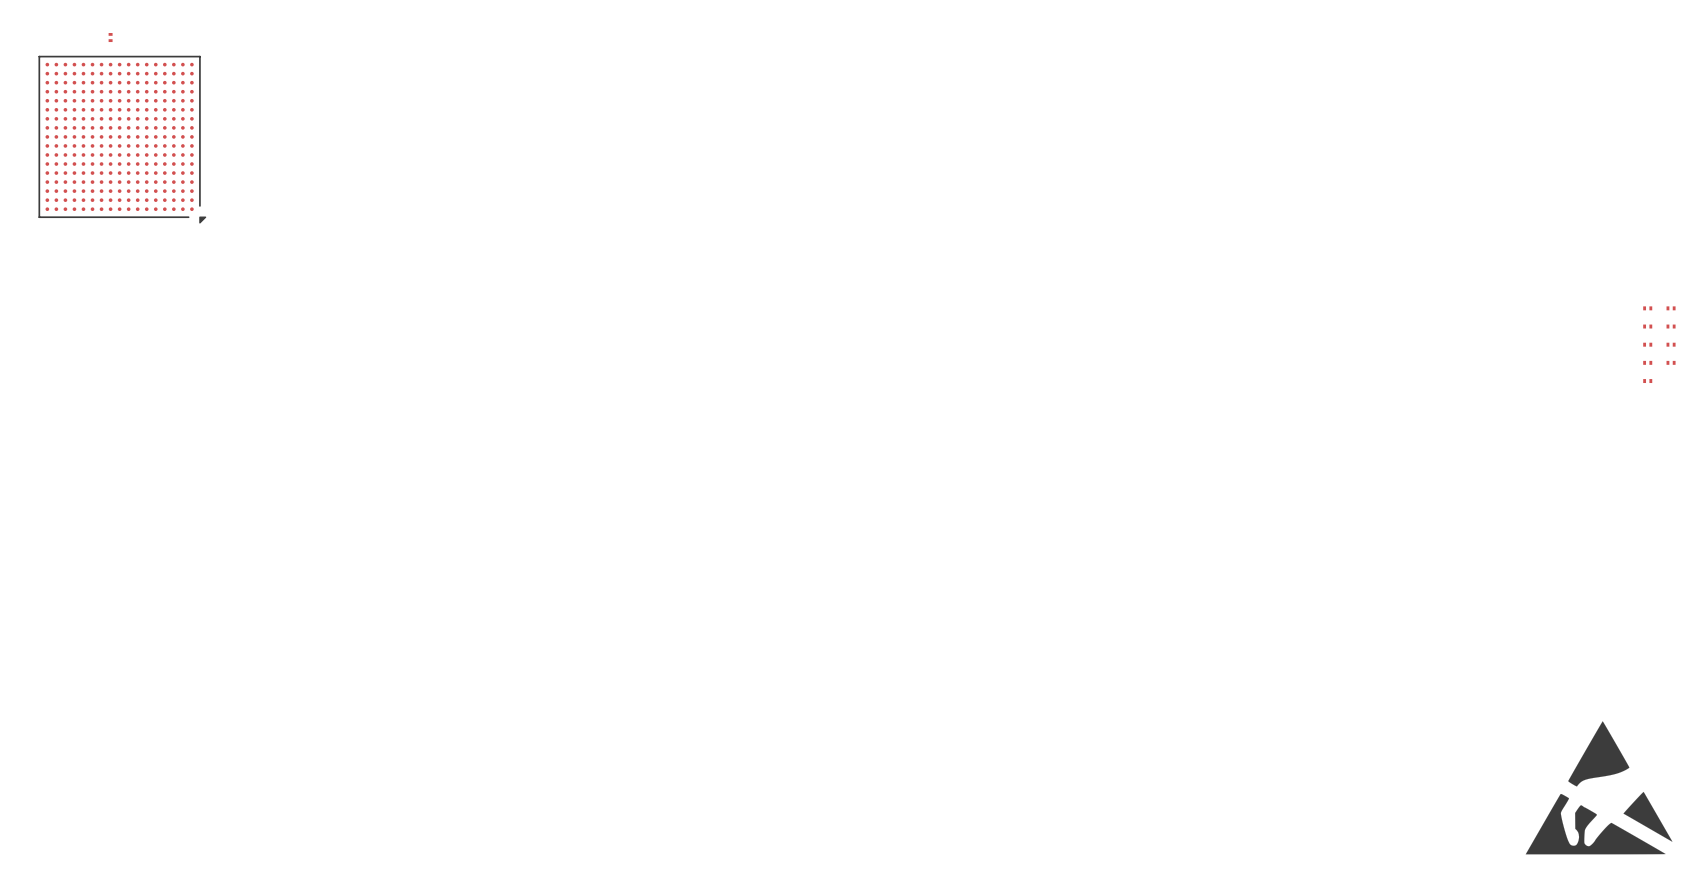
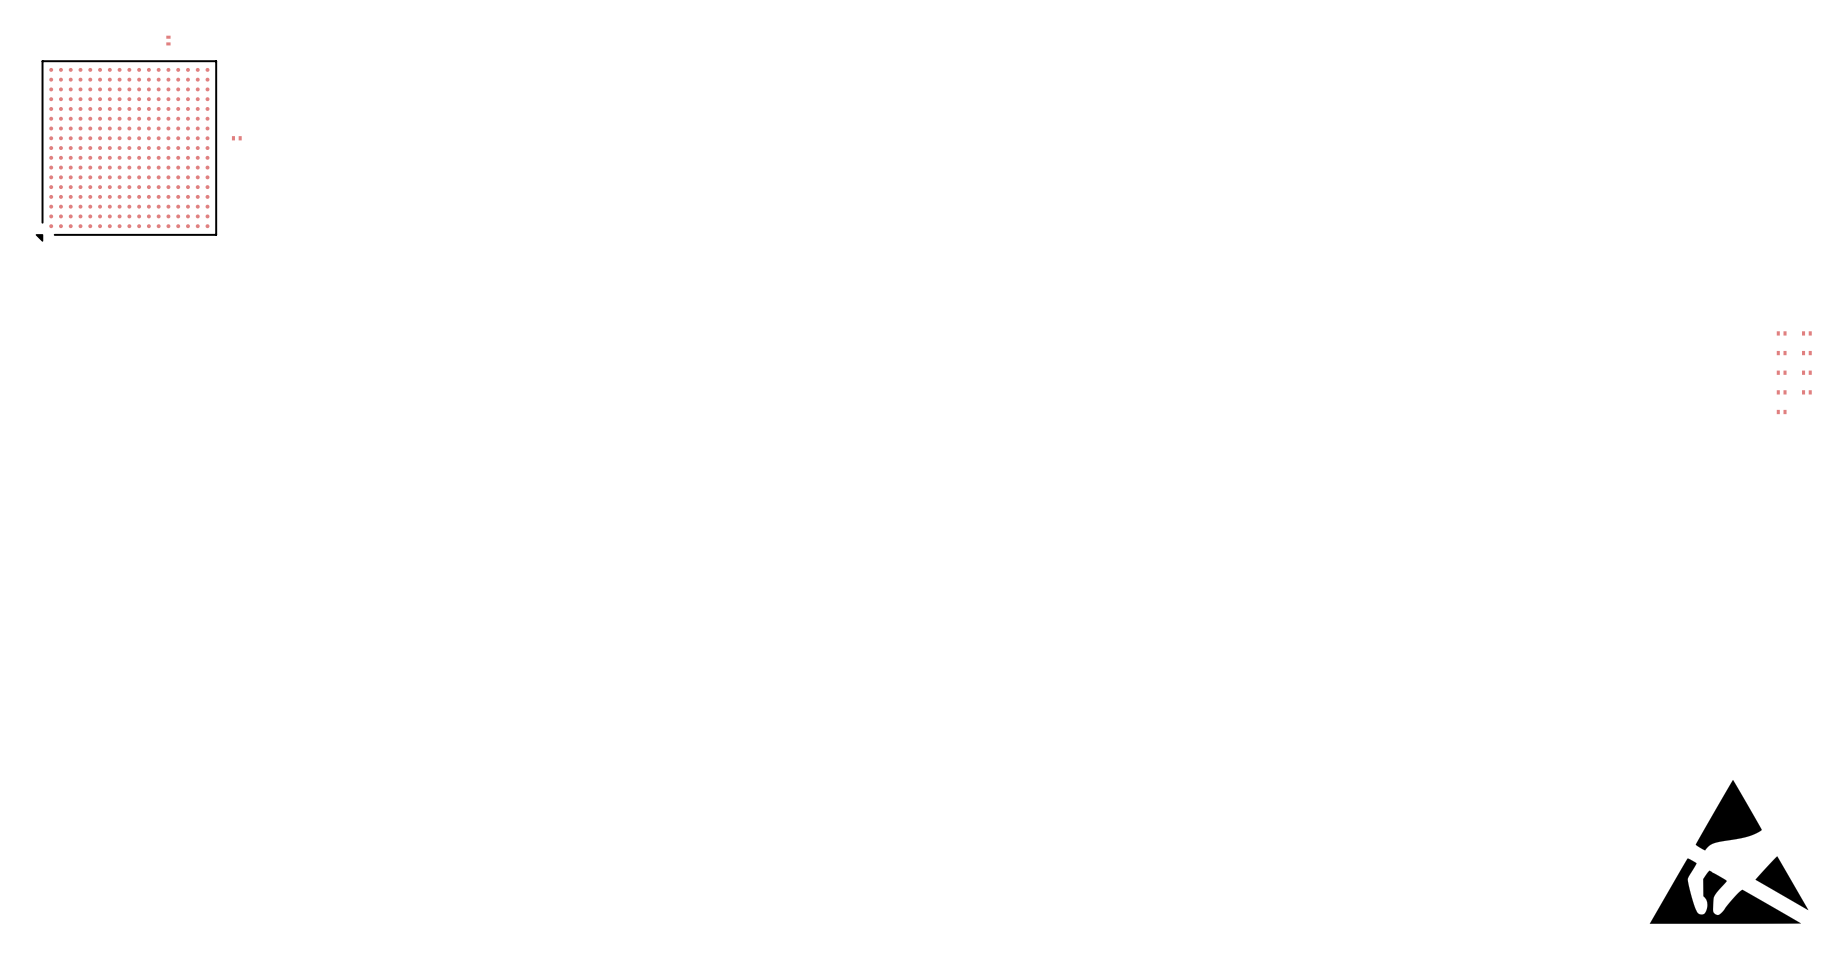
part position: (110, 37) -> (168, 40)
part: none -> (236, 138)
part rotation: 0° (122, 139) -> 90° clockwise (126, 151)

